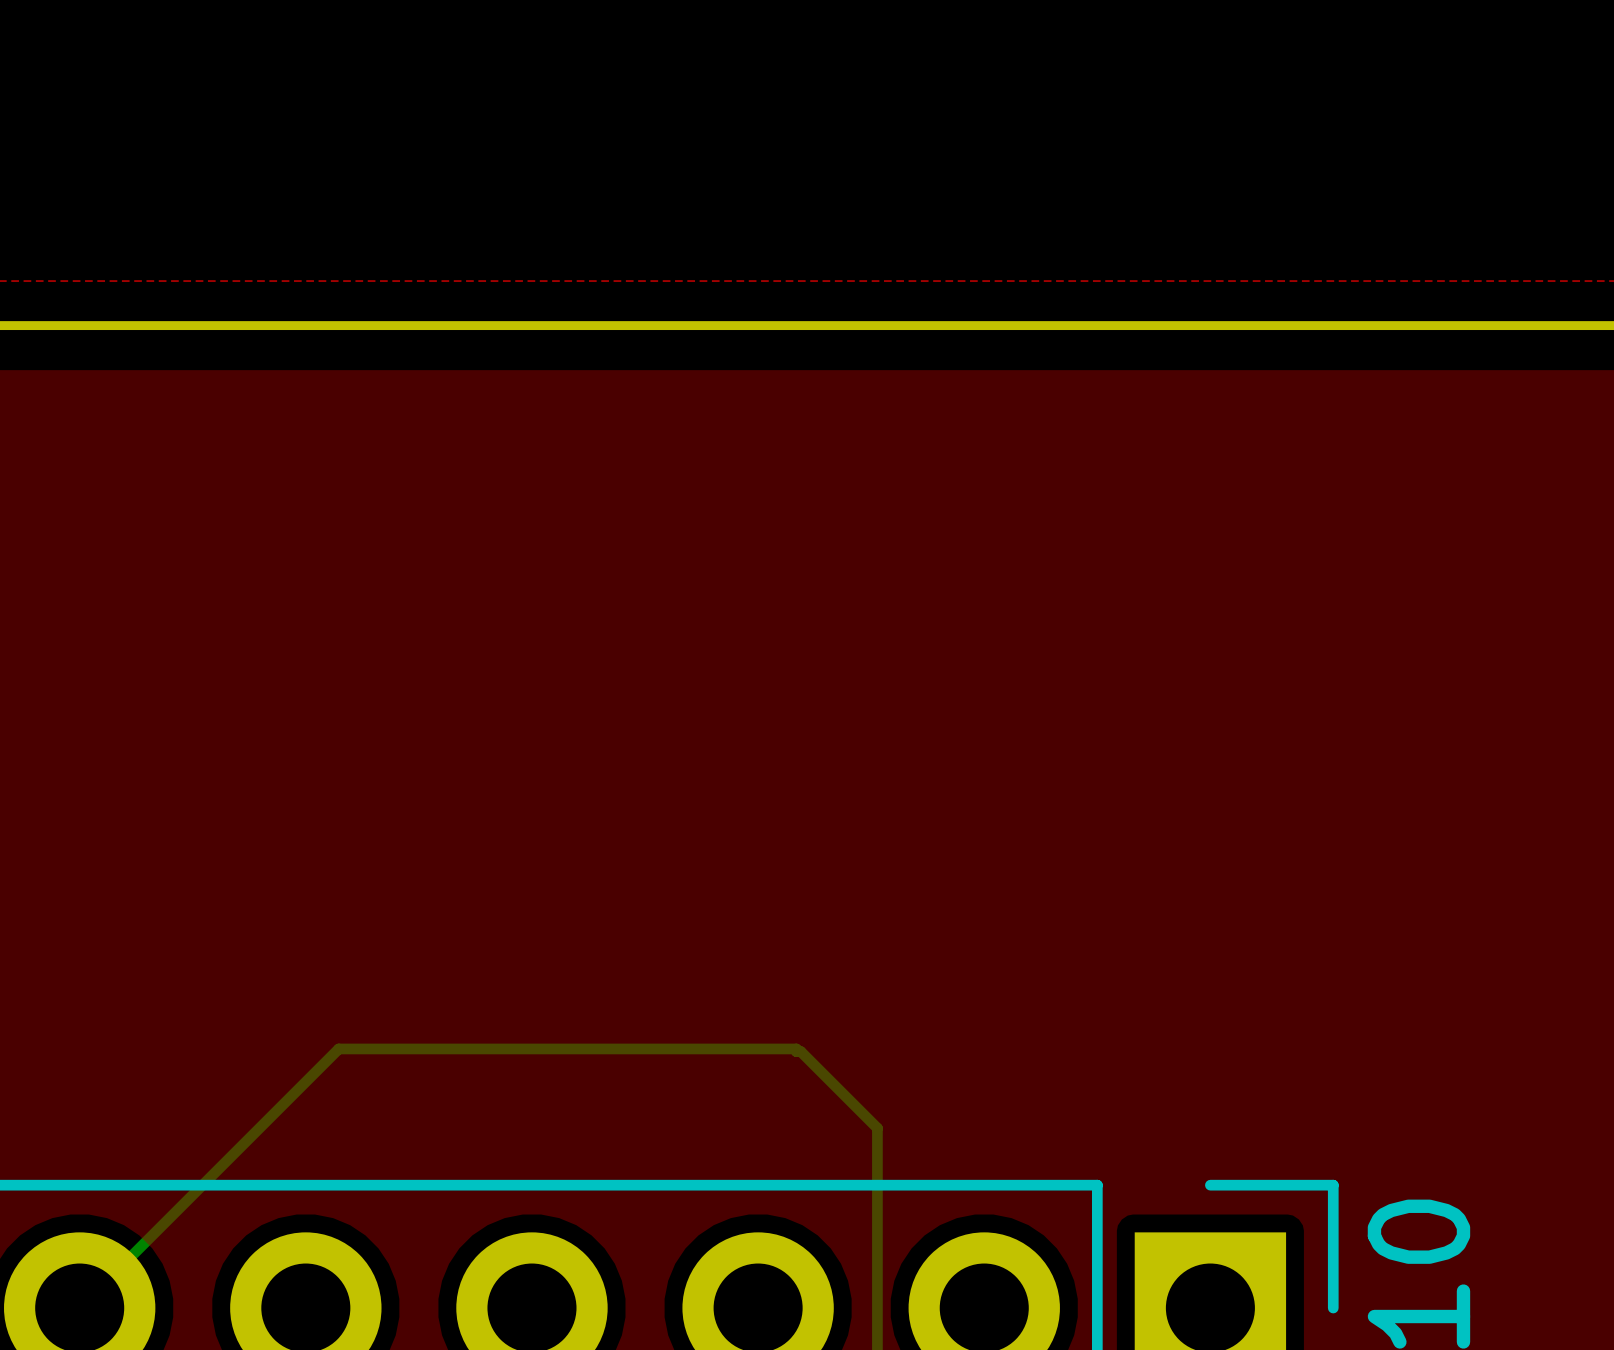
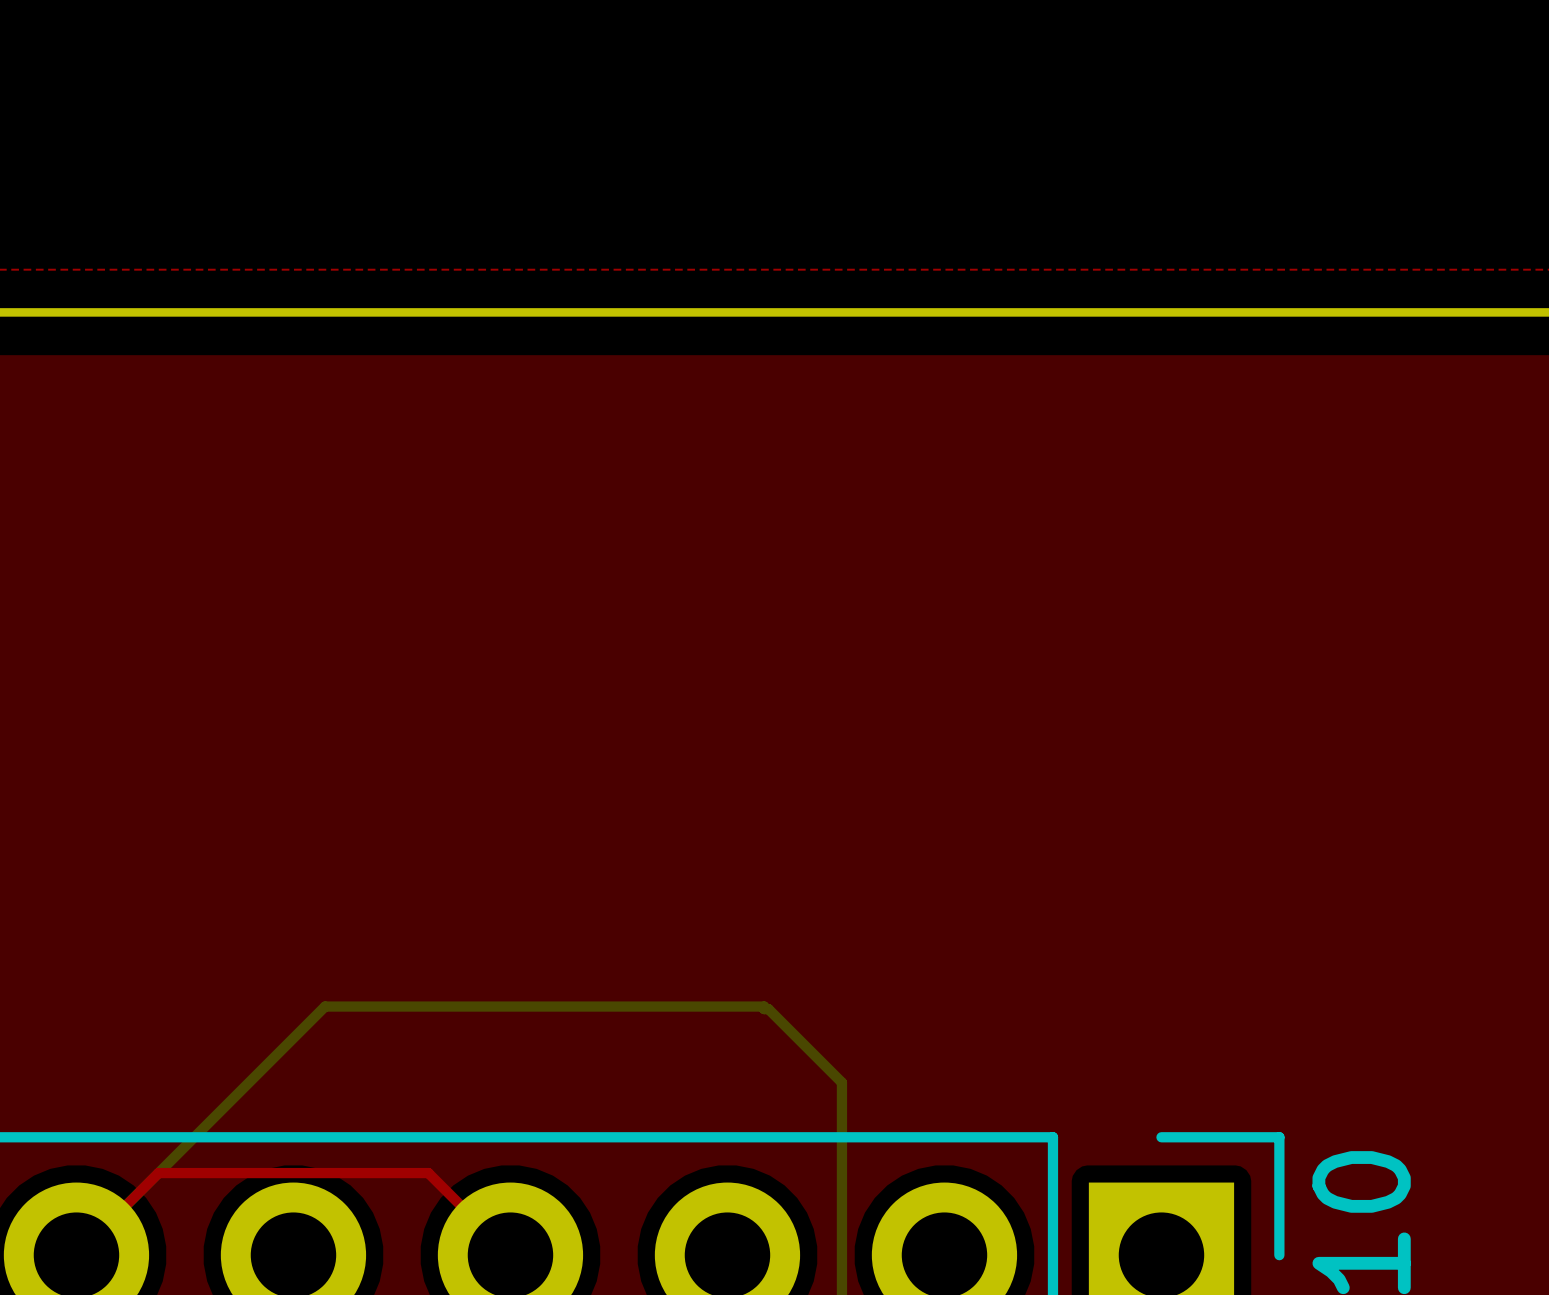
top track: none -> (76, 1255) (158, 1173) (428, 1173) (510, 1255)

